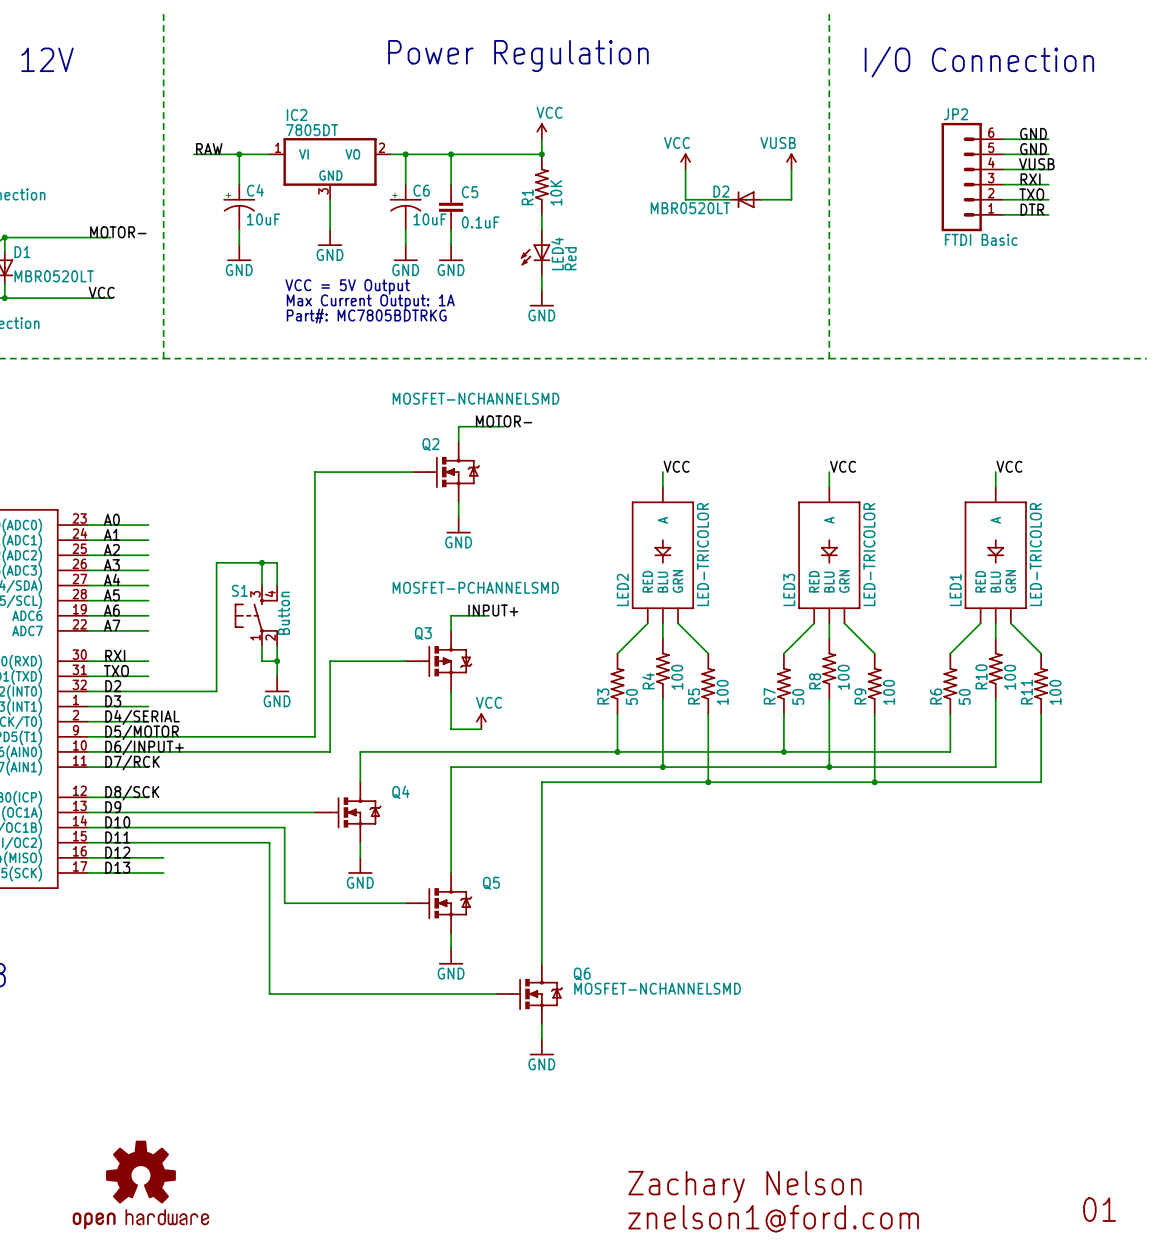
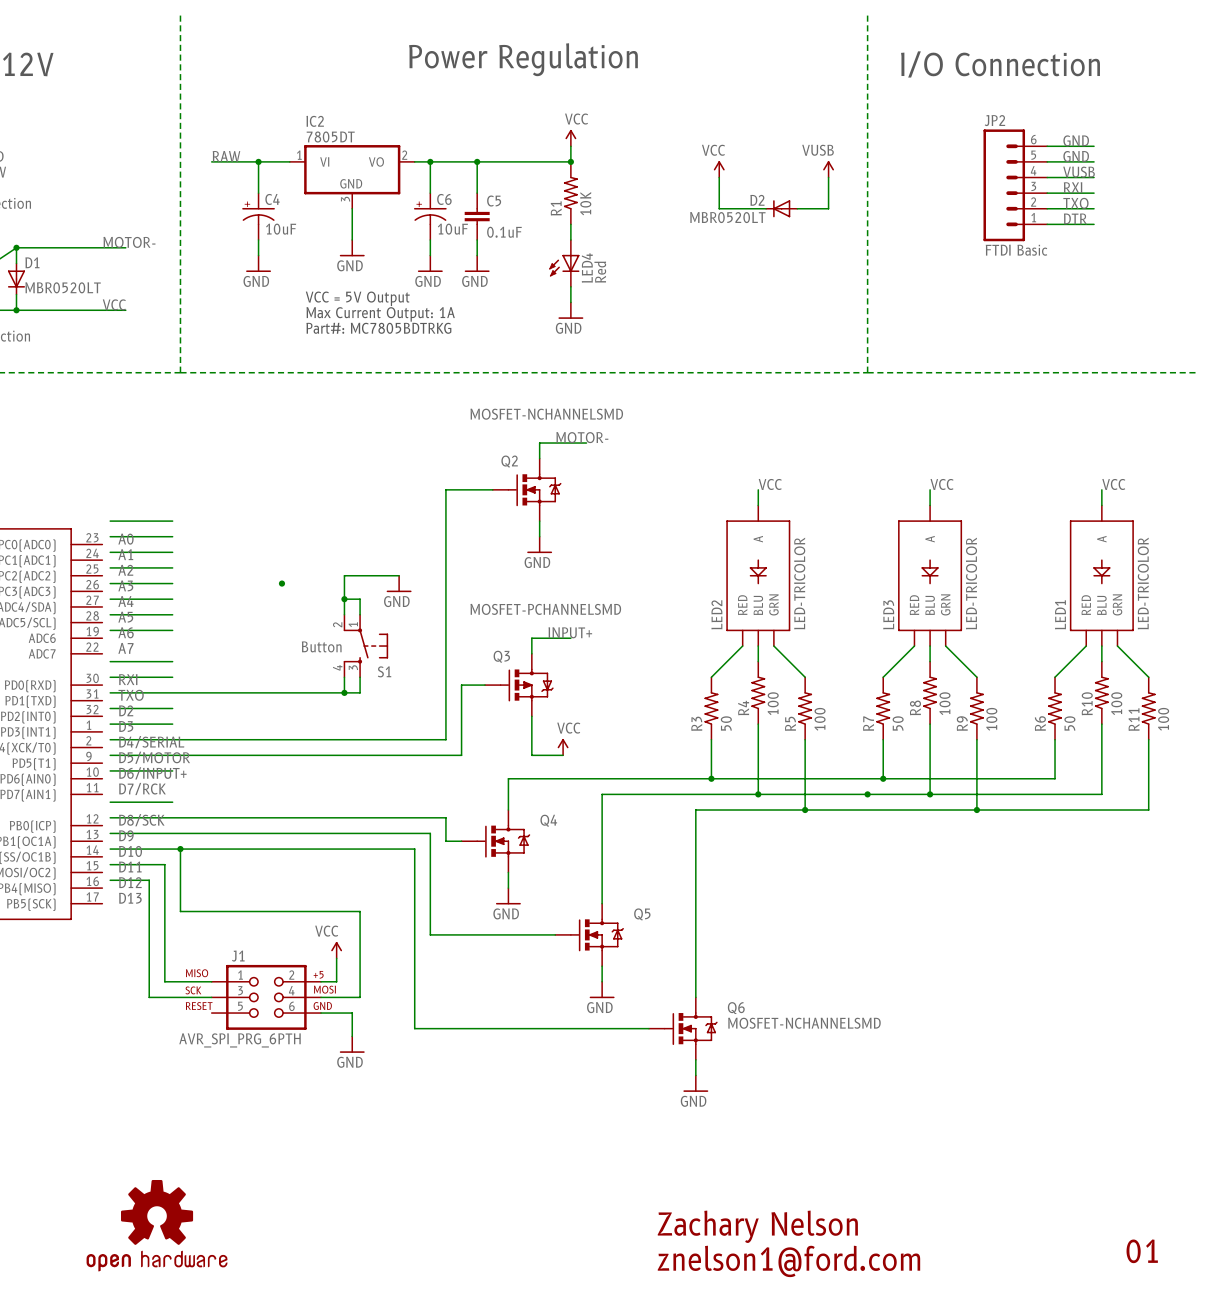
label position: MOTOR- (504, 421) -> MOTOR- (582, 437)
wire: (504, 426) (458, 426) (458, 441) -> (586, 443) (539, 443) (539, 458)
label: VCC (676, 466) -> none
label: none -> VCC (770, 484)
label: VCC (843, 466) -> none
label: none -> VCC (942, 484)
label: VCC (1009, 466) -> none
label: none -> VCC (1113, 484)
wire: (413, 472) (314, 472) (314, 736) (88, 736) -> none
Q2 position: (446, 472) -> (527, 489)
wire: none -> (492, 489) (445, 489) (445, 739) (110, 739)
wire: (662, 472) (662, 487) -> (758, 489) (758, 505)
wire: (829, 472) (829, 487) -> (930, 489) (930, 505)
wire: (995, 472) (995, 487) -> (1101, 489) (1101, 505)
wire: (458, 502) (458, 517) -> (539, 521) (539, 536)
wire: (88, 525) (148, 525) -> (110, 521) (172, 521)
power symbol: GND (458, 525) -> none
power symbol: none -> GND (539, 544)
wire: (88, 540) (148, 540) -> (110, 536) (172, 536)
wire: (88, 555) (148, 555) -> (110, 552) (172, 552)
wire: none -> (399, 575) (344, 575) (344, 614)
LED2 position: (662, 555) -> (758, 575)
LED3 position: (829, 555) -> (930, 575)
LED1 position: (995, 555) -> (1101, 575)
wire: (261, 562) (261, 585) -> none
power symbol: none -> GND (399, 583)
wire: (88, 570) (148, 570) -> (110, 567) (172, 567)
wire: none -> (344, 599) (360, 599) (360, 614)
junction: none -> (344, 599)
wire: (88, 585) (148, 585) -> (110, 583) (172, 583)
wire: (277, 585) (277, 562) (216, 562) (216, 691) (88, 691) -> none
wire: (88, 600) (148, 600) -> (110, 599) (172, 599)
label position: INPUT+ (493, 610) -> INPUT+ (570, 632)
S1 value position: Button (283, 613) -> Button (321, 646)
wire: (88, 615) (148, 615) -> (110, 614) (172, 614)
S1 rotation: 0° (256, 615) -> 180° (366, 646)
S1 position: (256, 615) -> (366, 646)
wire: (488, 615) (451, 615) (451, 630) -> (570, 638) (531, 638) (531, 653)
wire: (647, 623) (617, 653) -> (742, 646) (711, 677)
wire: (662, 623) (662, 638) -> (758, 646) (758, 661)
wire: (678, 623) (708, 653) -> (773, 646) (805, 677)
wire: (814, 623) (783, 653) -> (914, 646) (883, 677)
wire: (829, 623) (829, 638) -> (930, 646) (930, 661)
wire: (844, 623) (874, 653) -> (945, 646) (976, 677)
wire: (980, 623) (950, 653) -> (1086, 646) (1055, 677)
wire: (995, 623) (995, 638) -> (1101, 646) (1101, 661)
wire: (1010, 623) (1041, 653) -> (1117, 646) (1148, 677)
wire: (88, 630) (148, 630) -> (110, 630) (172, 630)
wire: (261, 646) (261, 661) (277, 661) -> none
wire: (277, 646) (277, 676) -> none
wire: none -> (344, 677) (344, 692)
wire: none -> (360, 677) (360, 692) (110, 692)
wire: (88, 661) (148, 661) -> (110, 661) (172, 661)
junction: (277, 661) -> none
wire: (405, 661) (330, 661) (330, 751) (88, 751) -> none
Q3 position: (438, 661) -> (519, 685)
wire: none -> (484, 685) (461, 685) (461, 755) (110, 755)
junction: none -> (344, 692)
R4 position: (662, 668) -> (758, 692)
R8 position: (829, 668) -> (930, 692)
R10 position: (995, 668) -> (1101, 692)
wire: (88, 676) (148, 676) -> (110, 677) (172, 677)
R3 position: (617, 683) -> (711, 708)
R5 position: (708, 683) -> (805, 708)
R7 position: (783, 683) -> (883, 708)
R9 position: (874, 683) -> (976, 708)
R6 position: (950, 683) -> (1055, 708)
R11 position: (1041, 683) -> (1148, 708)
power symbol: GND (277, 684) -> none
wire: (451, 691) (451, 729) (481, 729) -> (531, 716) (531, 755) (563, 755)
wire: (662, 699) (662, 767) -> (758, 724) (758, 794)
wire: (829, 699) (829, 767) -> (930, 724) (930, 794)
wire: (995, 699) (995, 767) -> (1101, 724) (1101, 794) (1039, 794)
wire: (88, 706) (148, 706) -> (110, 708) (172, 708)
wire: (617, 714) (617, 751) -> (711, 739) (711, 778)
wire: (708, 714) (708, 782) -> (805, 739) (805, 810)
wire: (783, 714) (783, 751) -> (883, 739) (883, 778)
wire: (874, 714) (874, 782) -> (976, 739) (976, 810)
wire: (950, 714) (950, 751) -> (1055, 739) (1055, 778) (992, 778)
wire: (1041, 714) (1041, 782) -> (1148, 739) (1148, 810) (1086, 810)
wire: (88, 721) (148, 721) -> (110, 724) (172, 724)
power symbol position: VCC (481, 721) -> VCC (563, 747)
wire: (481, 751) (360, 751) (360, 782) -> (508, 778) (508, 810)
junction: (617, 751) -> none
junction: none -> (711, 778)
junction: (783, 751) -> none
junction: none -> (883, 778)
wire: (88, 767) (148, 767) -> (110, 770) (172, 770)
wire: (572, 767) (451, 767) (451, 872) -> (602, 794) (602, 903)
junction: (662, 767) -> none
junction: none -> (758, 794)
junction: none -> (930, 794)
wire: (662, 782) (541, 782) (541, 963) -> (695, 810) (695, 997)
junction: (708, 782) -> none
junction: none -> (805, 810)
junction: (874, 782) -> none
junction: none -> (976, 810)
wire: none -> (110, 817) (445, 817) (445, 841) (461, 841)
wire: (88, 797) (148, 797) -> (110, 802) (172, 802)
wire: none -> (110, 833) (430, 833) (430, 934) (555, 934)
wire: (88, 812) (314, 812) -> none
Q4 position: (348, 812) -> (495, 841)
wire: none -> (180, 849) (180, 911) (360, 911) (360, 997) (321, 997)
junction: none -> (180, 849)
wire: (88, 827) (284, 827) (284, 903) (405, 903) -> none
wire: none -> (110, 864) (164, 864) (164, 981) (211, 981)
wire: (88, 842) (269, 842) (269, 994) (390, 994) -> (110, 849) (414, 849) (414, 1028)
wire: (360, 842) (360, 857) -> (508, 872) (508, 888)
wire: none -> (110, 880) (149, 880) (149, 997) (211, 997)
wire: (88, 857) (163, 857) -> none
power symbol: GND (360, 865) -> none
power symbol: none -> GND (508, 896)
wire: (88, 872) (163, 872) -> none
Q5 position: (438, 903) -> (589, 934)
power symbol: none -> VCC (336, 950)
wire: none -> (336, 958) (336, 981) (321, 981)
wire: (451, 933) (451, 948) -> (602, 966) (602, 981)
power symbol: GND (451, 956) -> none
power symbol: none -> GND (602, 989)
J1: none -> AVR_SPI_PRG_6PTH (266, 997)
wire: none -> (321, 1013) (352, 1013) (352, 1036)
wire: none -> (524, 1028) (648, 1028)
Q6 position: (529, 994) -> (683, 1028)
power symbol: none -> GND (352, 1044)
wire: (541, 1024) (541, 1039) -> (695, 1059) (695, 1075)
power symbol: GND (541, 1047) -> none
power symbol: none -> GND (695, 1083)

